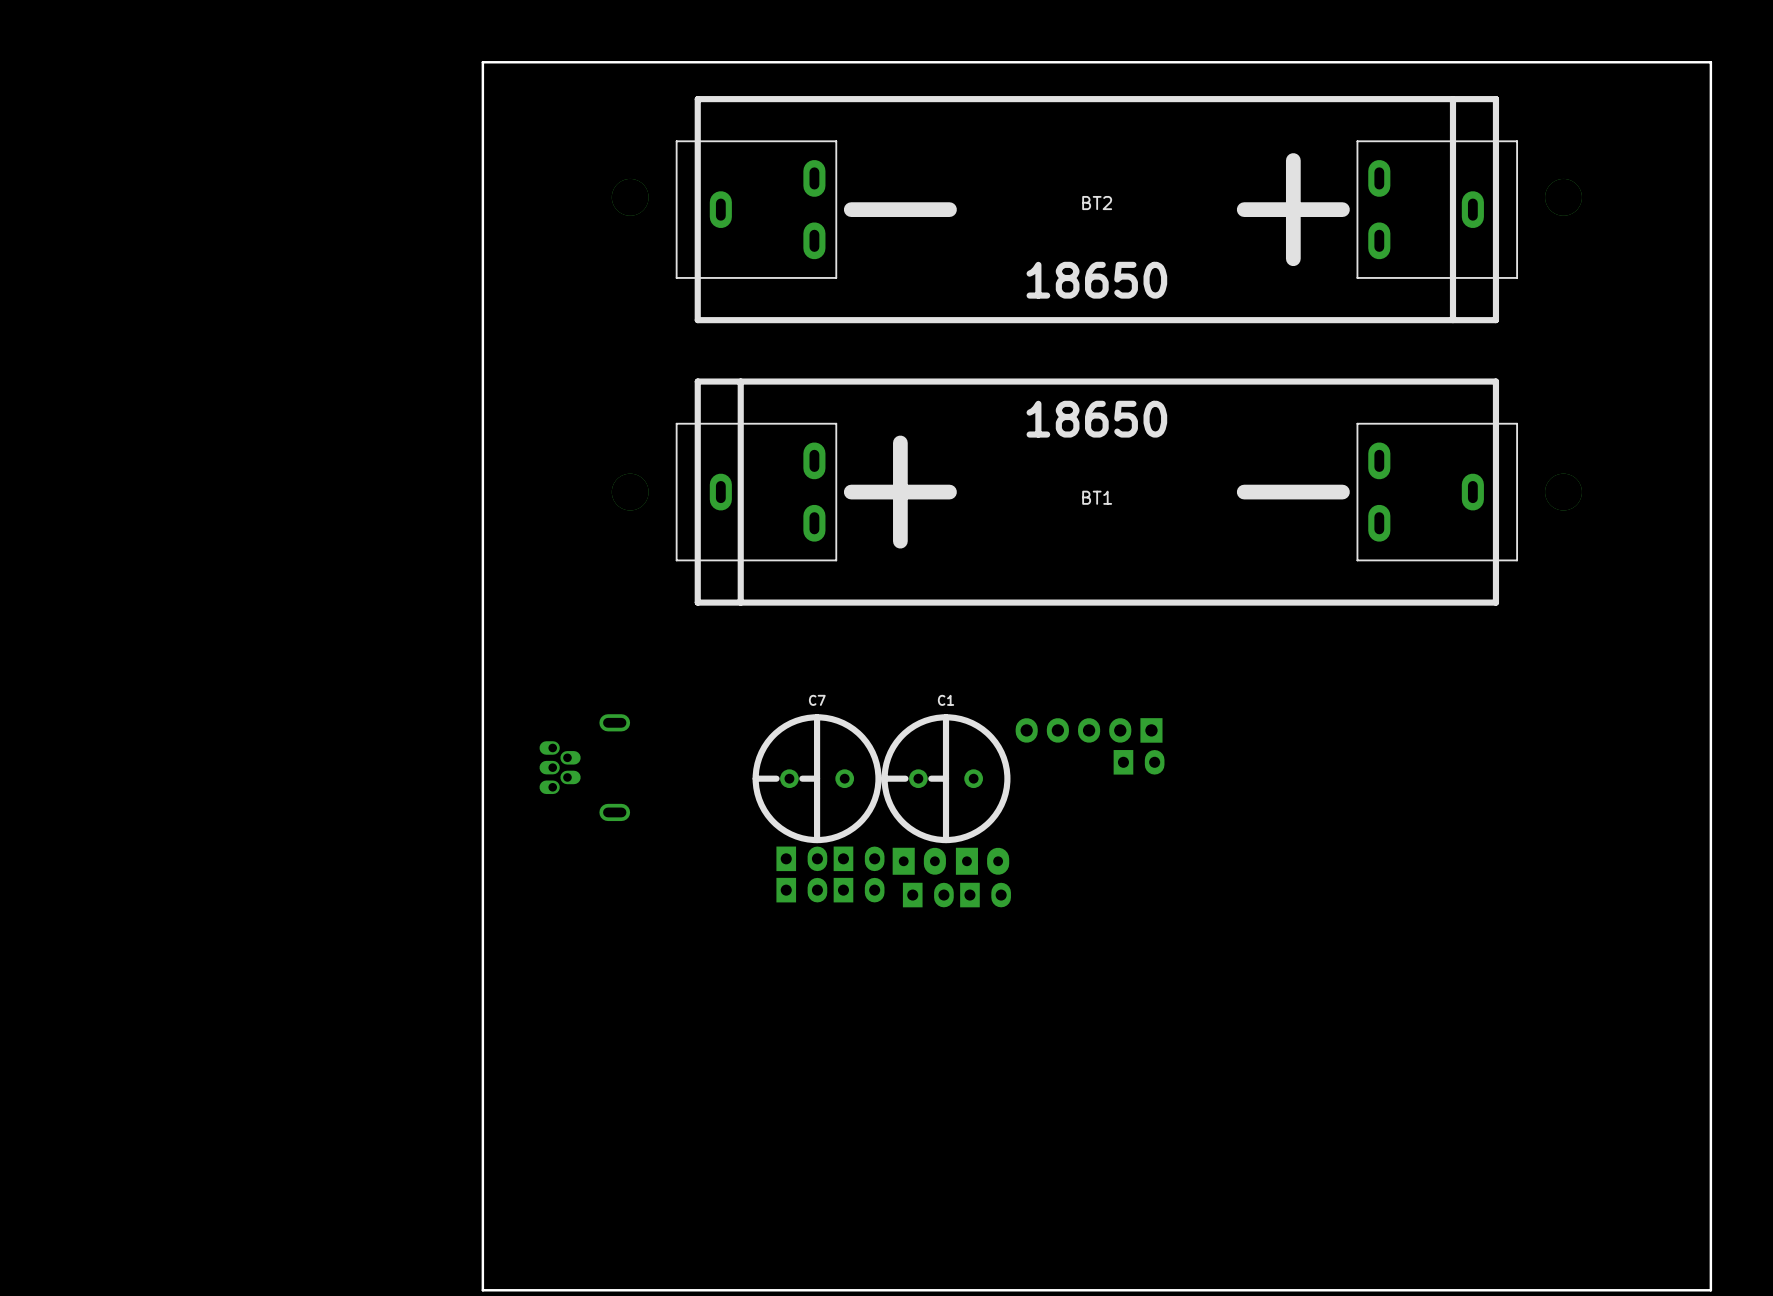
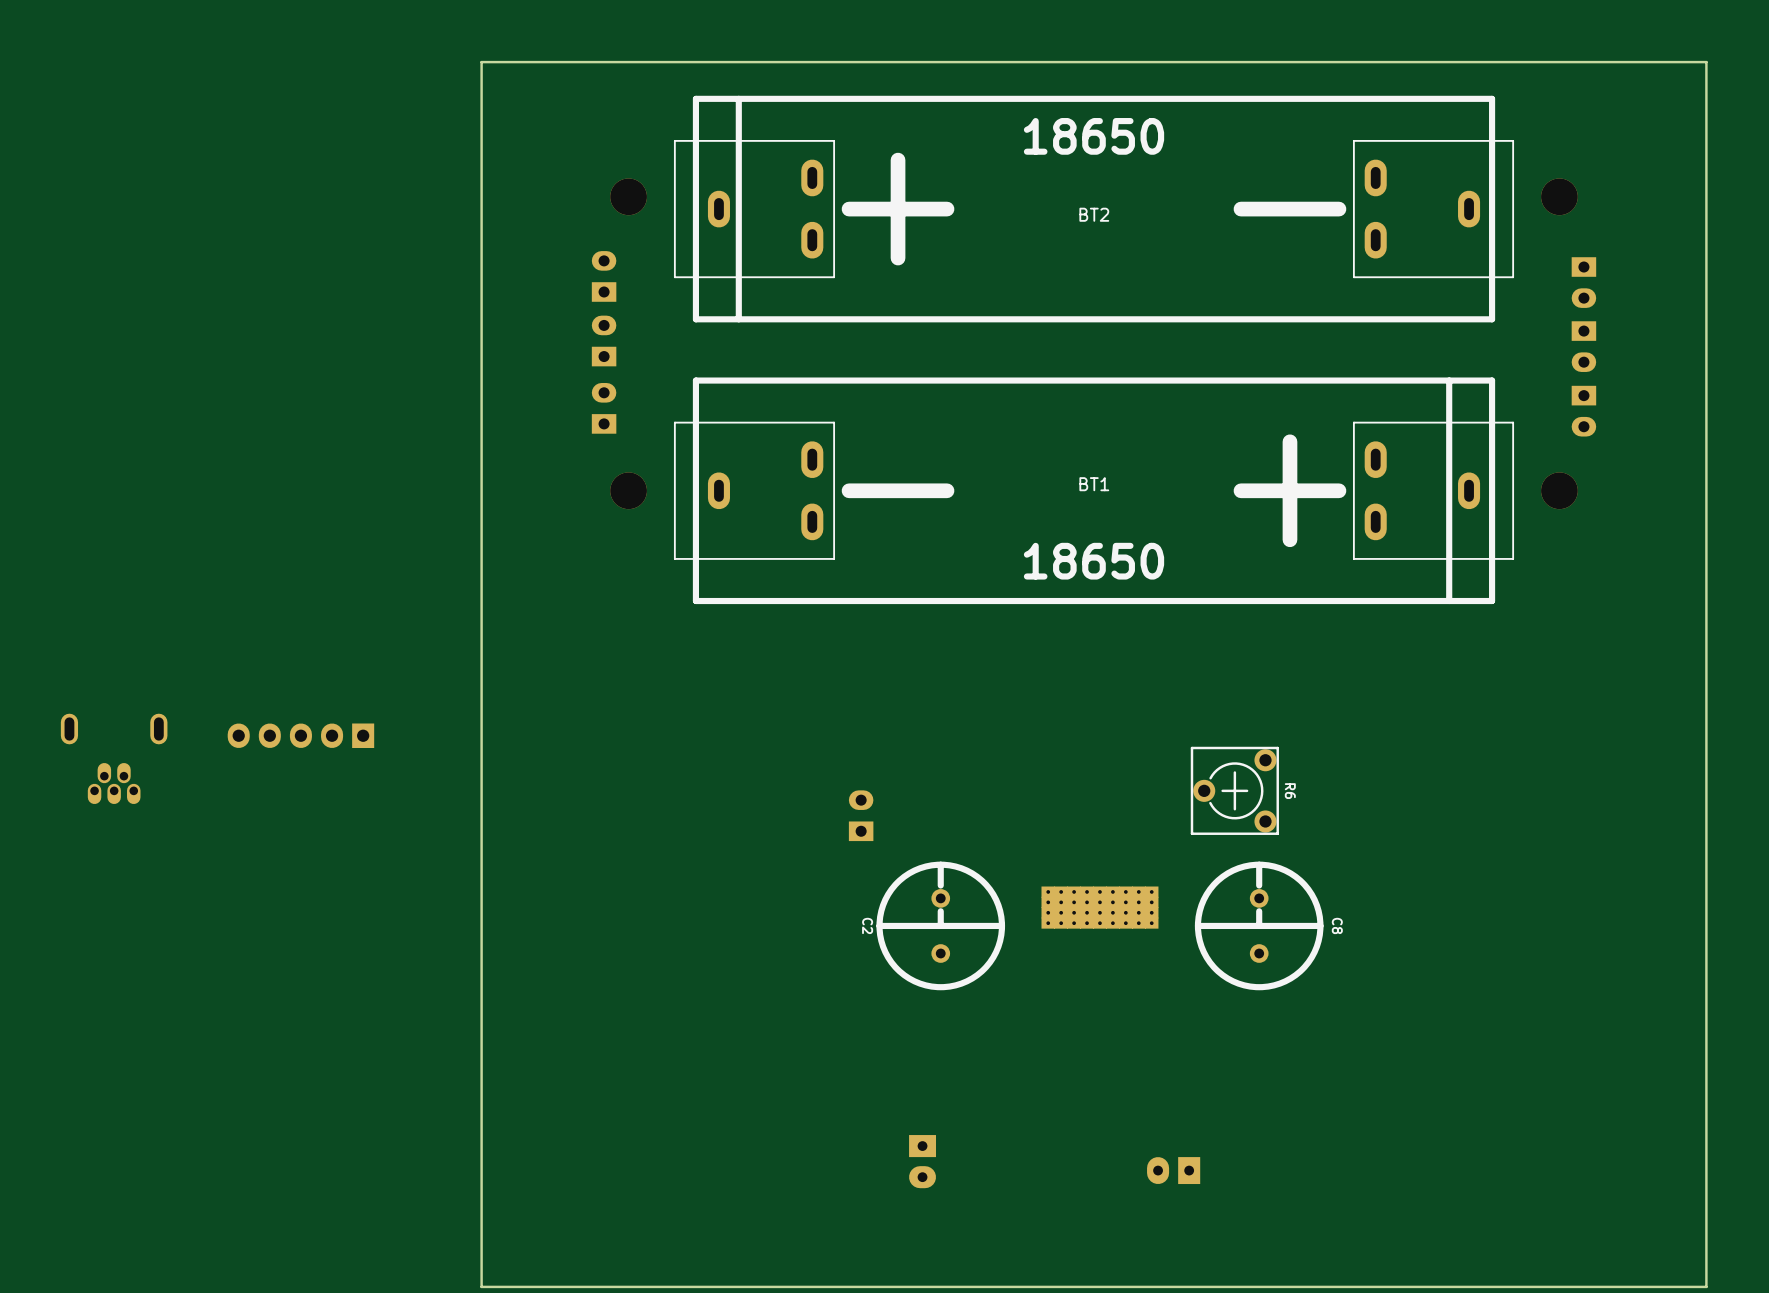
BT2 rotation: 0° (1096, 209) -> 180° (1094, 209)
part: none -> (604, 276)
part: none -> (1583, 282)
part: none -> (604, 340)
part: none -> (1583, 346)
part: none -> (604, 408)
part: none -> (1583, 411)
BT1 rotation: 0° (1096, 492) -> 180° (1094, 490)
part: (1089, 730) -> none
part: none -> (300, 735)
part: none -> (114, 758)
part: (1139, 762) -> none
part: (584, 767) -> none
C7: (817, 778) -> none
C1: (946, 778) -> none
R6: none -> (1234, 790)
part: none -> (861, 815)
part: (801, 858) -> none
part: (859, 858) -> none
part: (919, 861) -> none
part: (982, 861) -> none
part: (801, 890) -> none
part: (859, 890) -> none
part: (928, 895) -> none
part: (985, 895) -> none
part: none -> (1099, 907)
C2: none -> (940, 925)
C8: none -> (1259, 925)
part: none -> (922, 1161)
part: none -> (1173, 1170)

